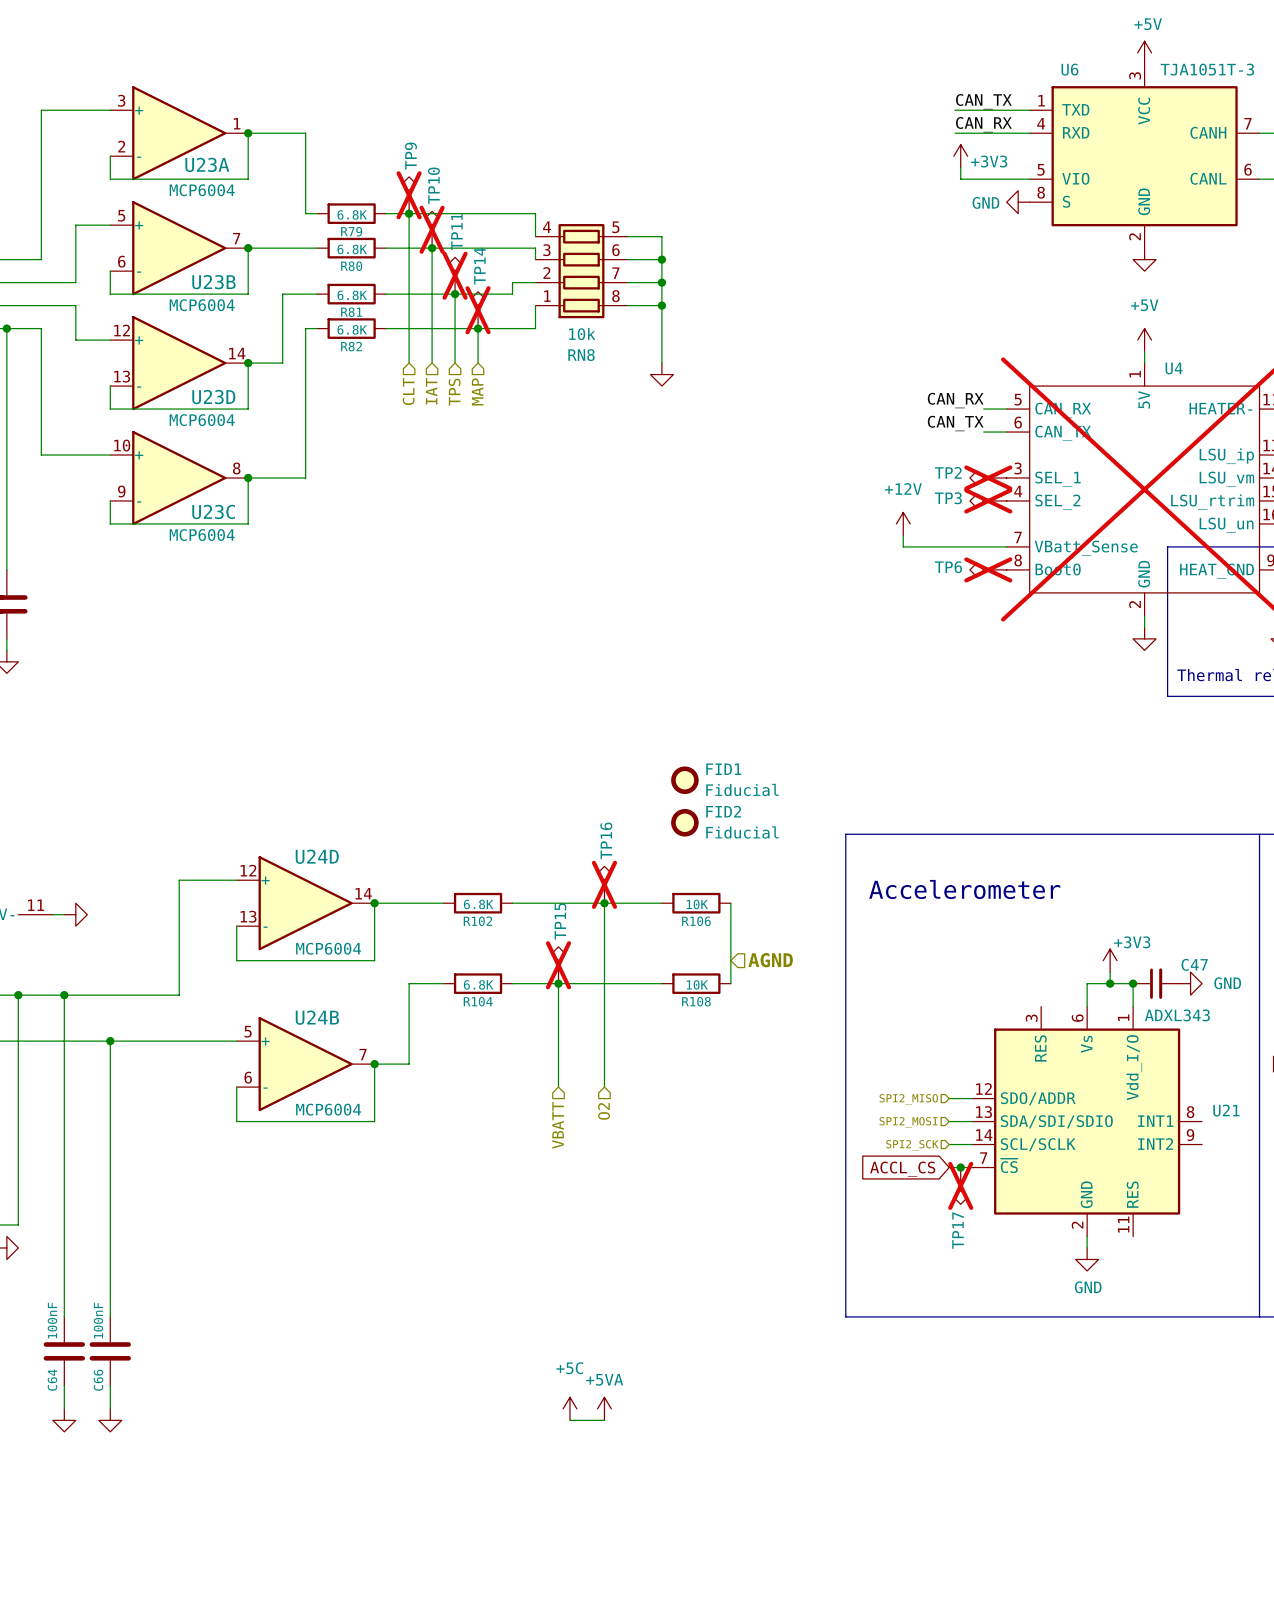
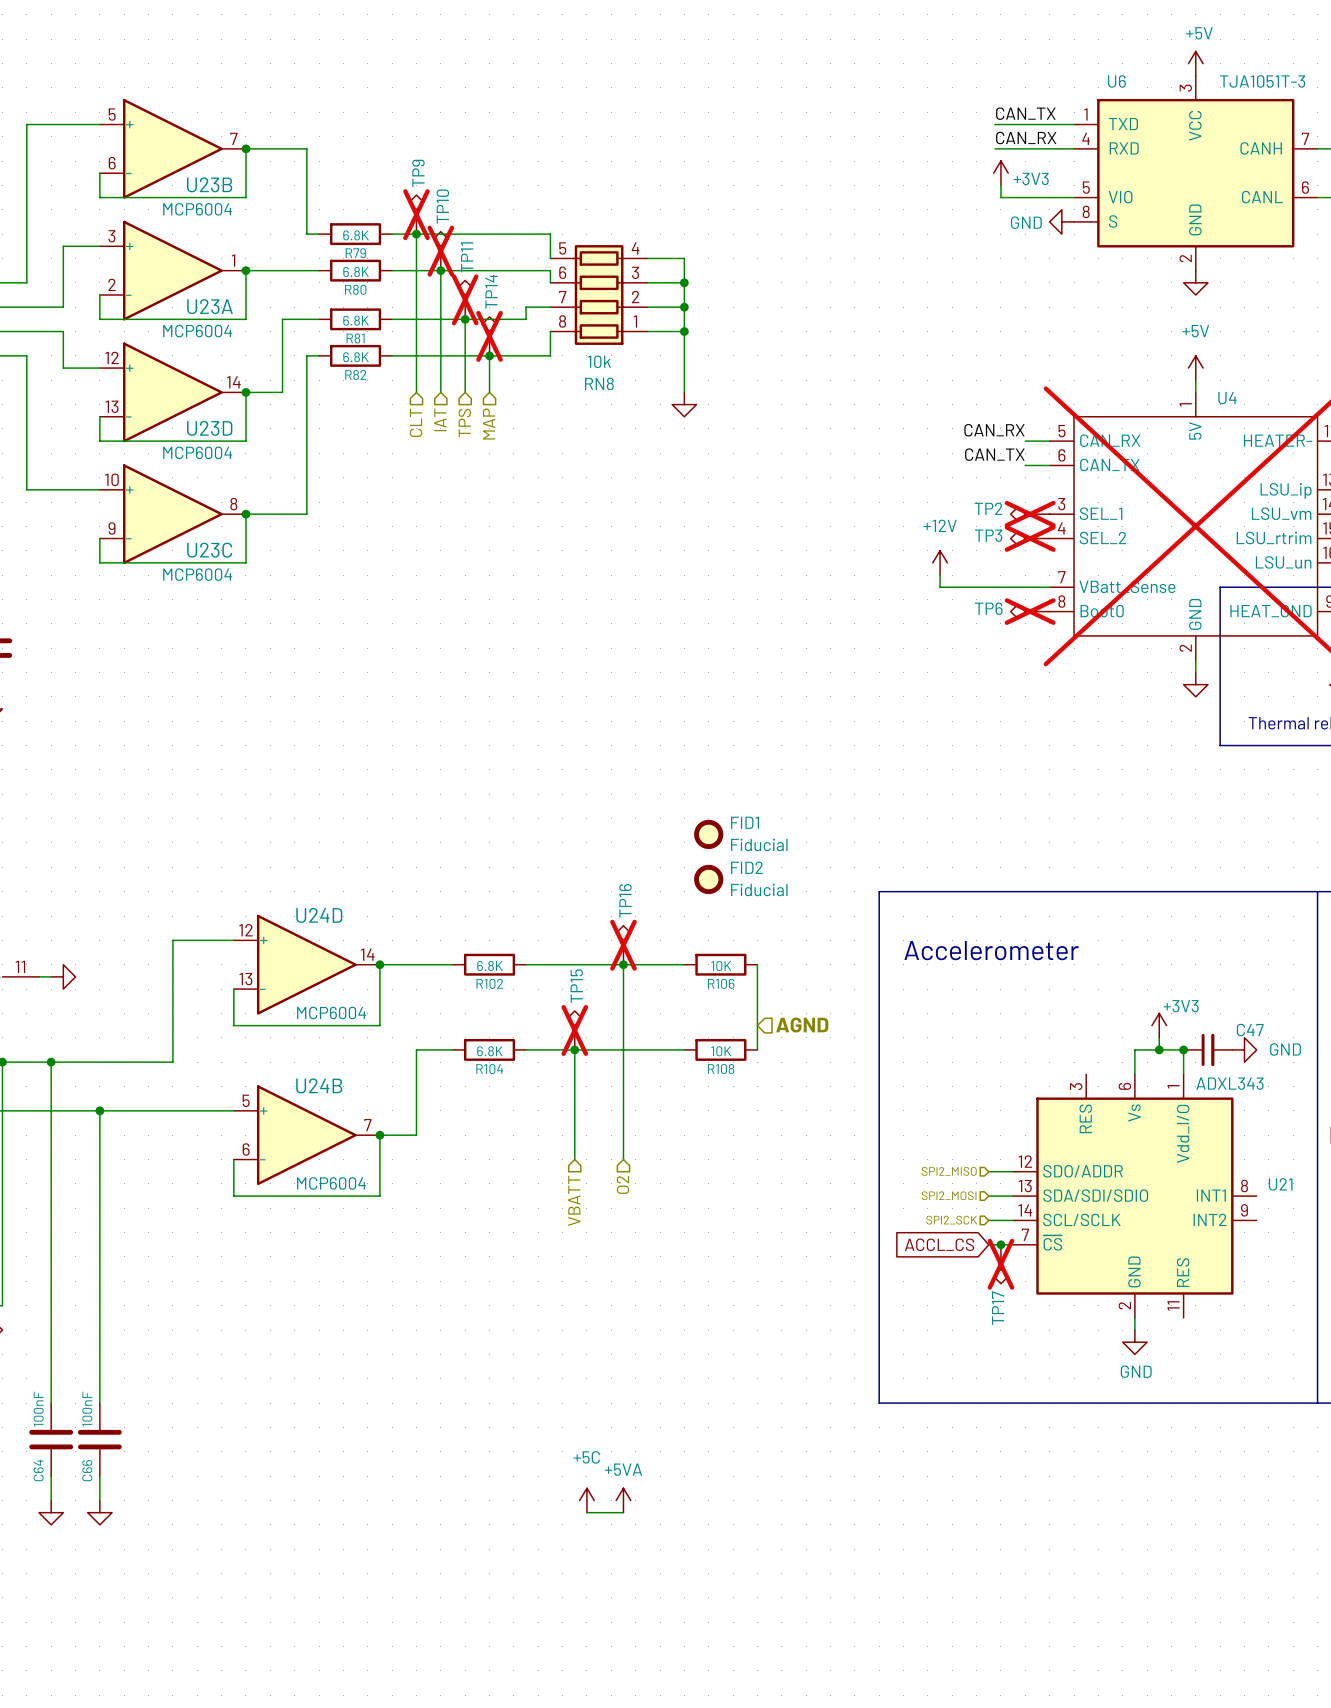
U23A position: (179, 133) -> (172, 270)
U23A name position: U23A (207, 164) -> U23A (210, 306)
U23B position: (179, 248) -> (172, 148)
RN8 flip: as is (581, 271) -> left-right (599, 294)

